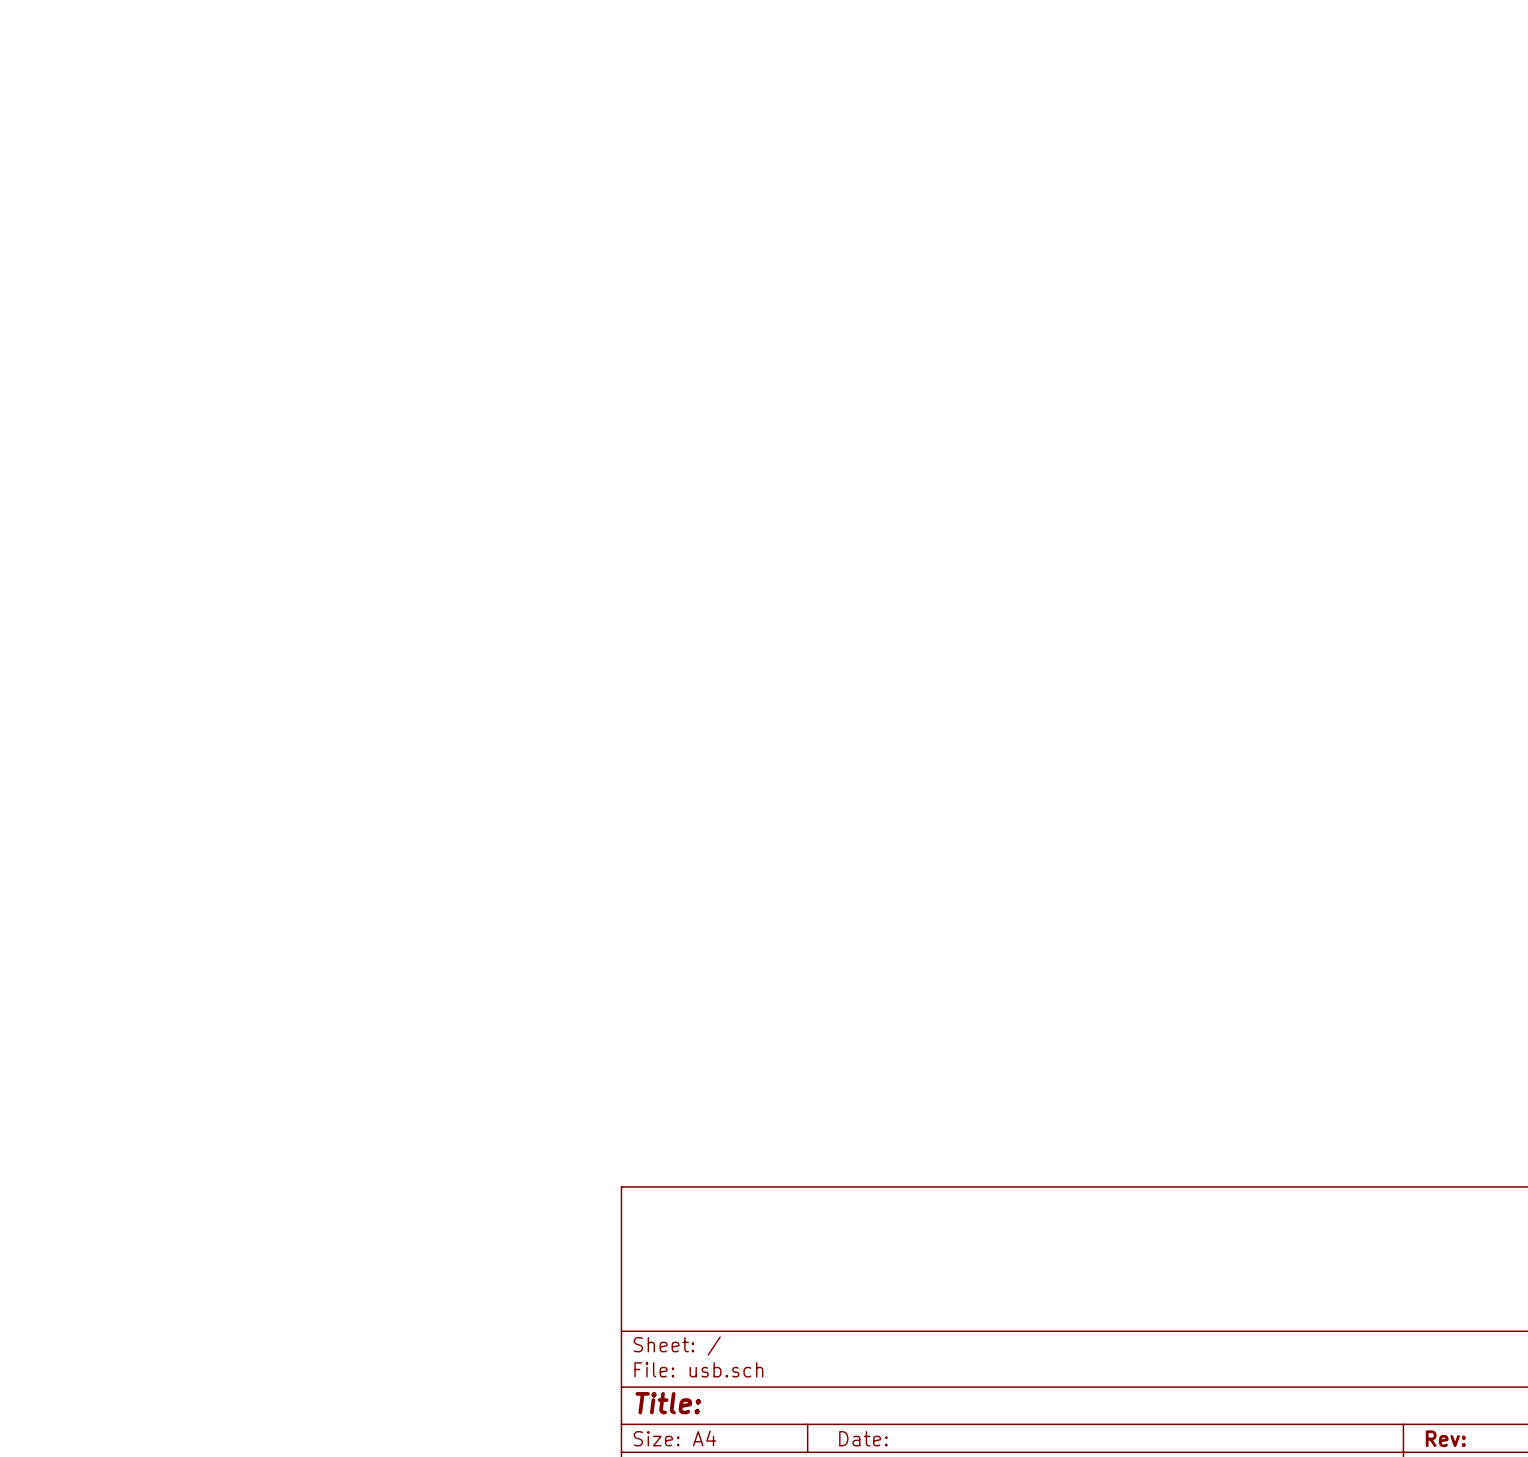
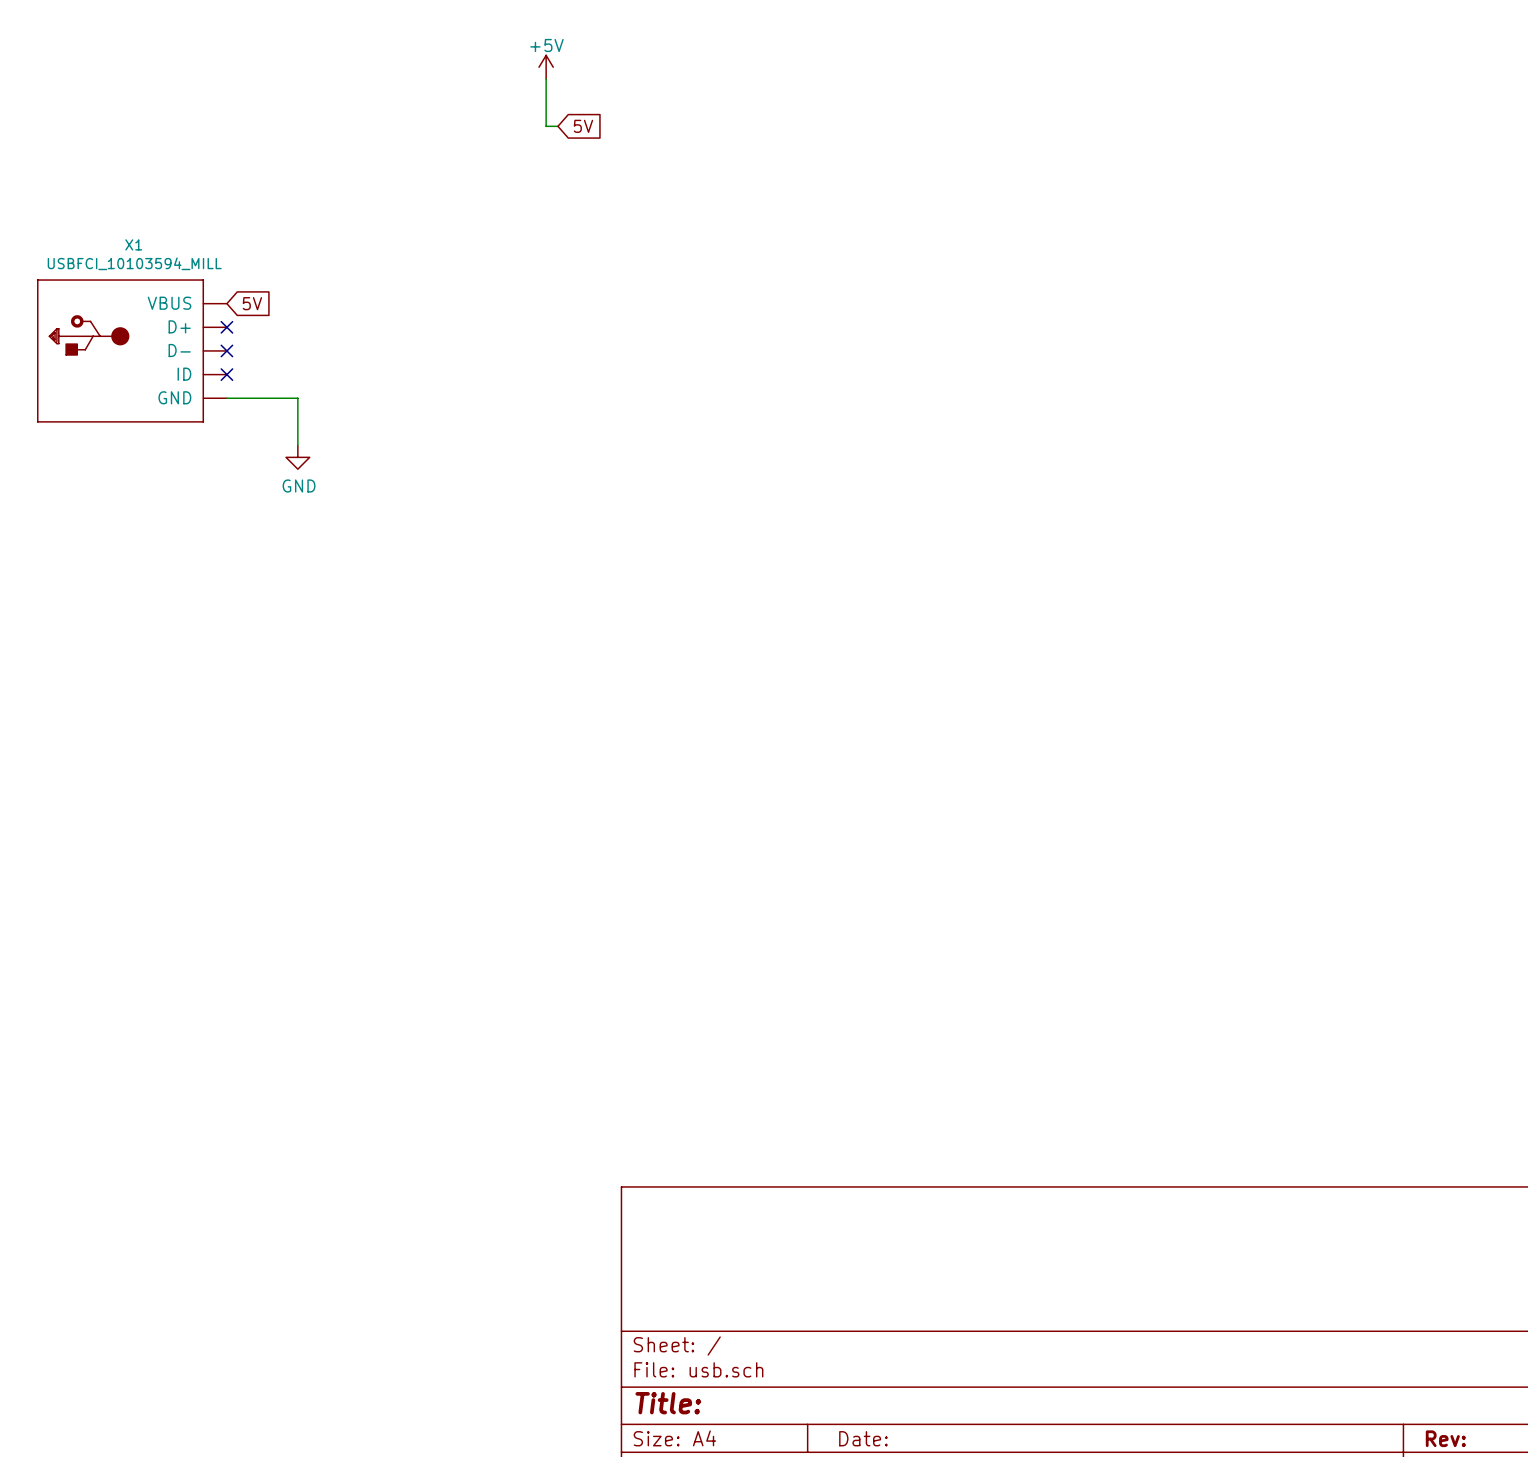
power symbol: none -> +5V (546, 67)
wire: none -> (546, 79) (546, 126) (557, 126)
global label: none -> 5V (583, 126)
global label: none -> 5V (252, 303)
no-connect mark: none -> (226, 327)
X1: none -> USBFCI_10103594_MILL (132, 350)
no-connect mark: none -> (226, 350)
no-connect mark: none -> (226, 374)
wire: none -> (226, 398) (297, 398) (297, 445)
power symbol: none -> GND (297, 457)

